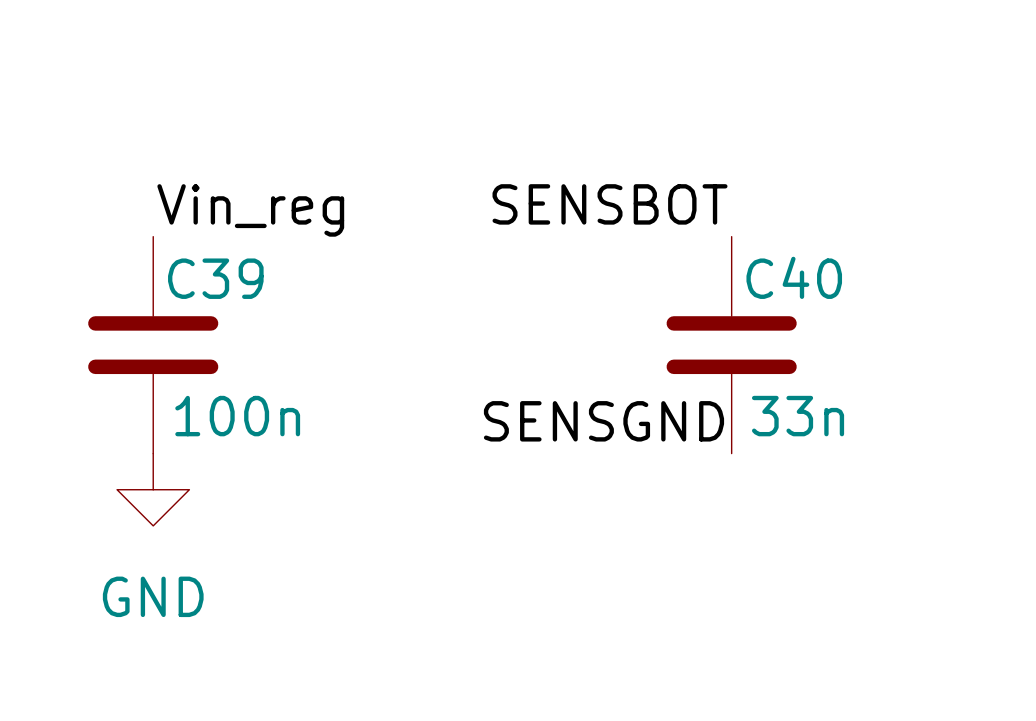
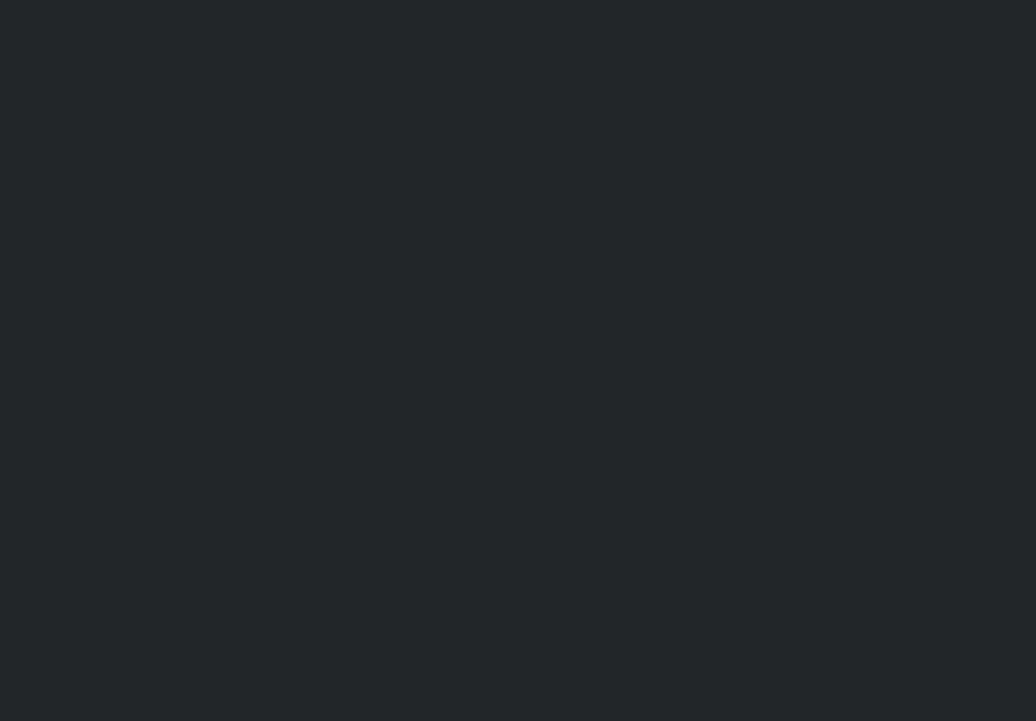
label: SENSBOT (610, 204) -> none
label: Vin_reg (250, 210) -> none
C39: 100n (153, 345) -> none
C40: 33n (731, 345) -> none
label: SENSGND (603, 421) -> none
power symbol: GND (153, 489) -> none

